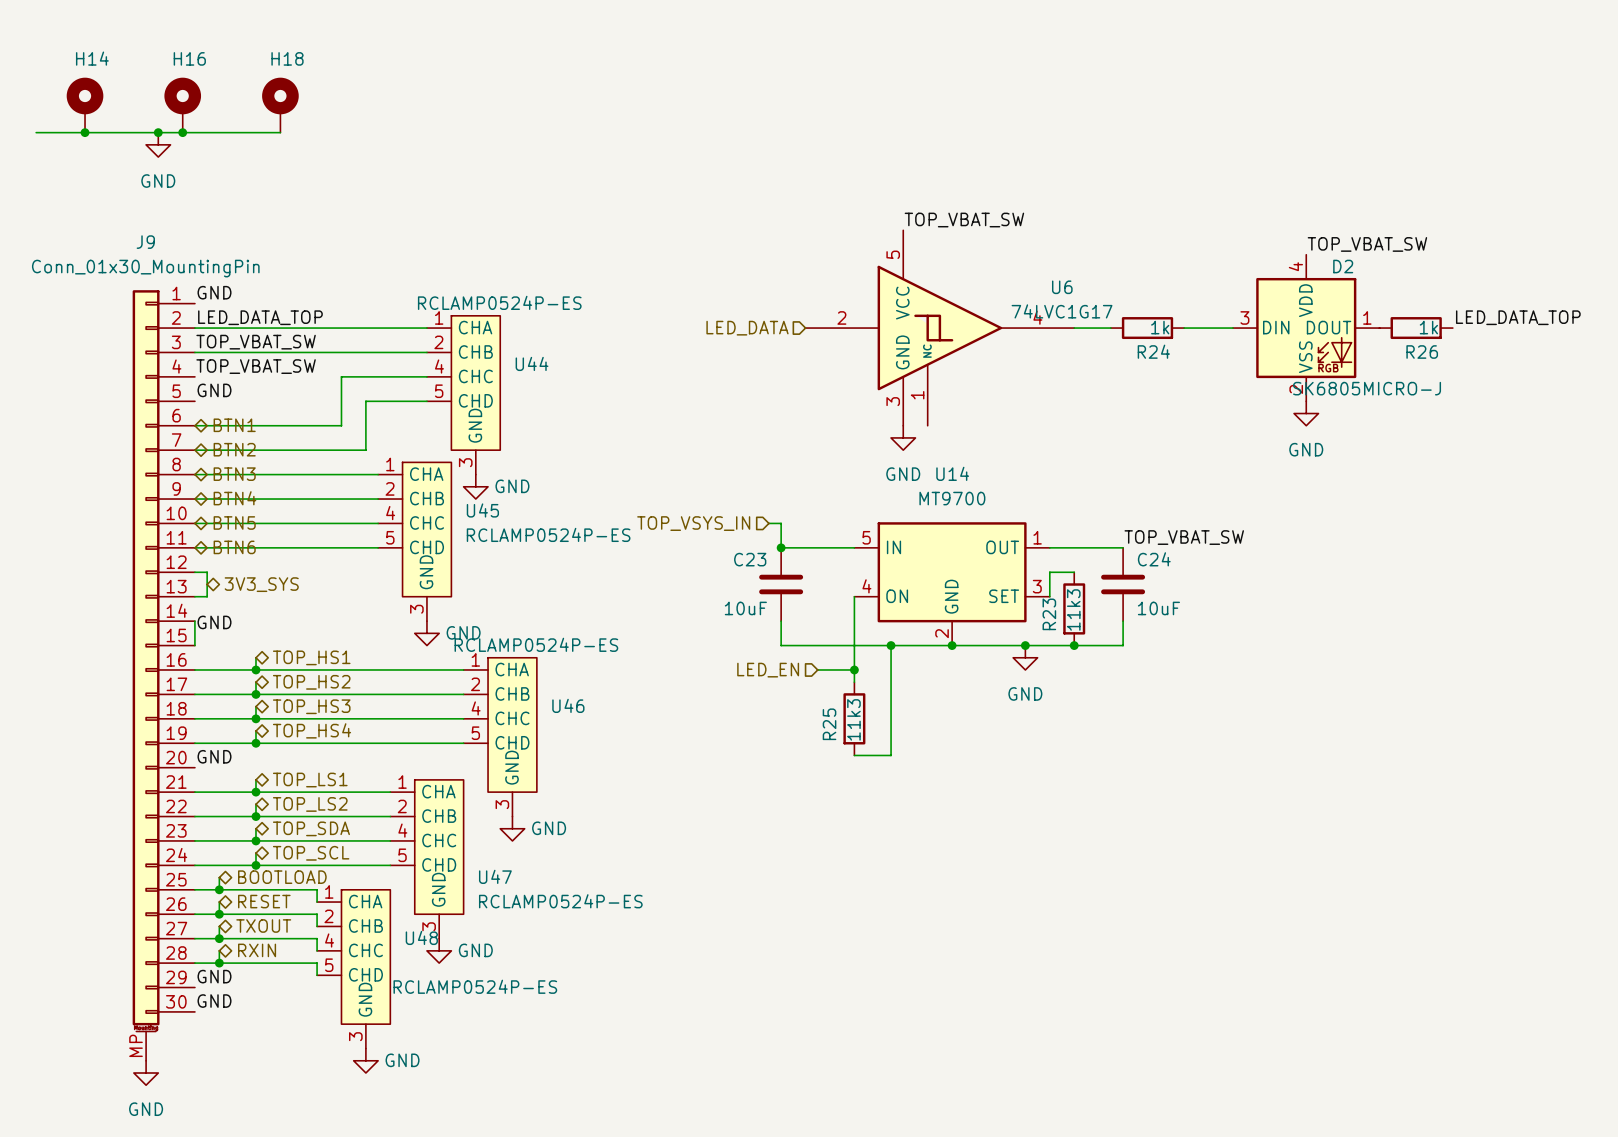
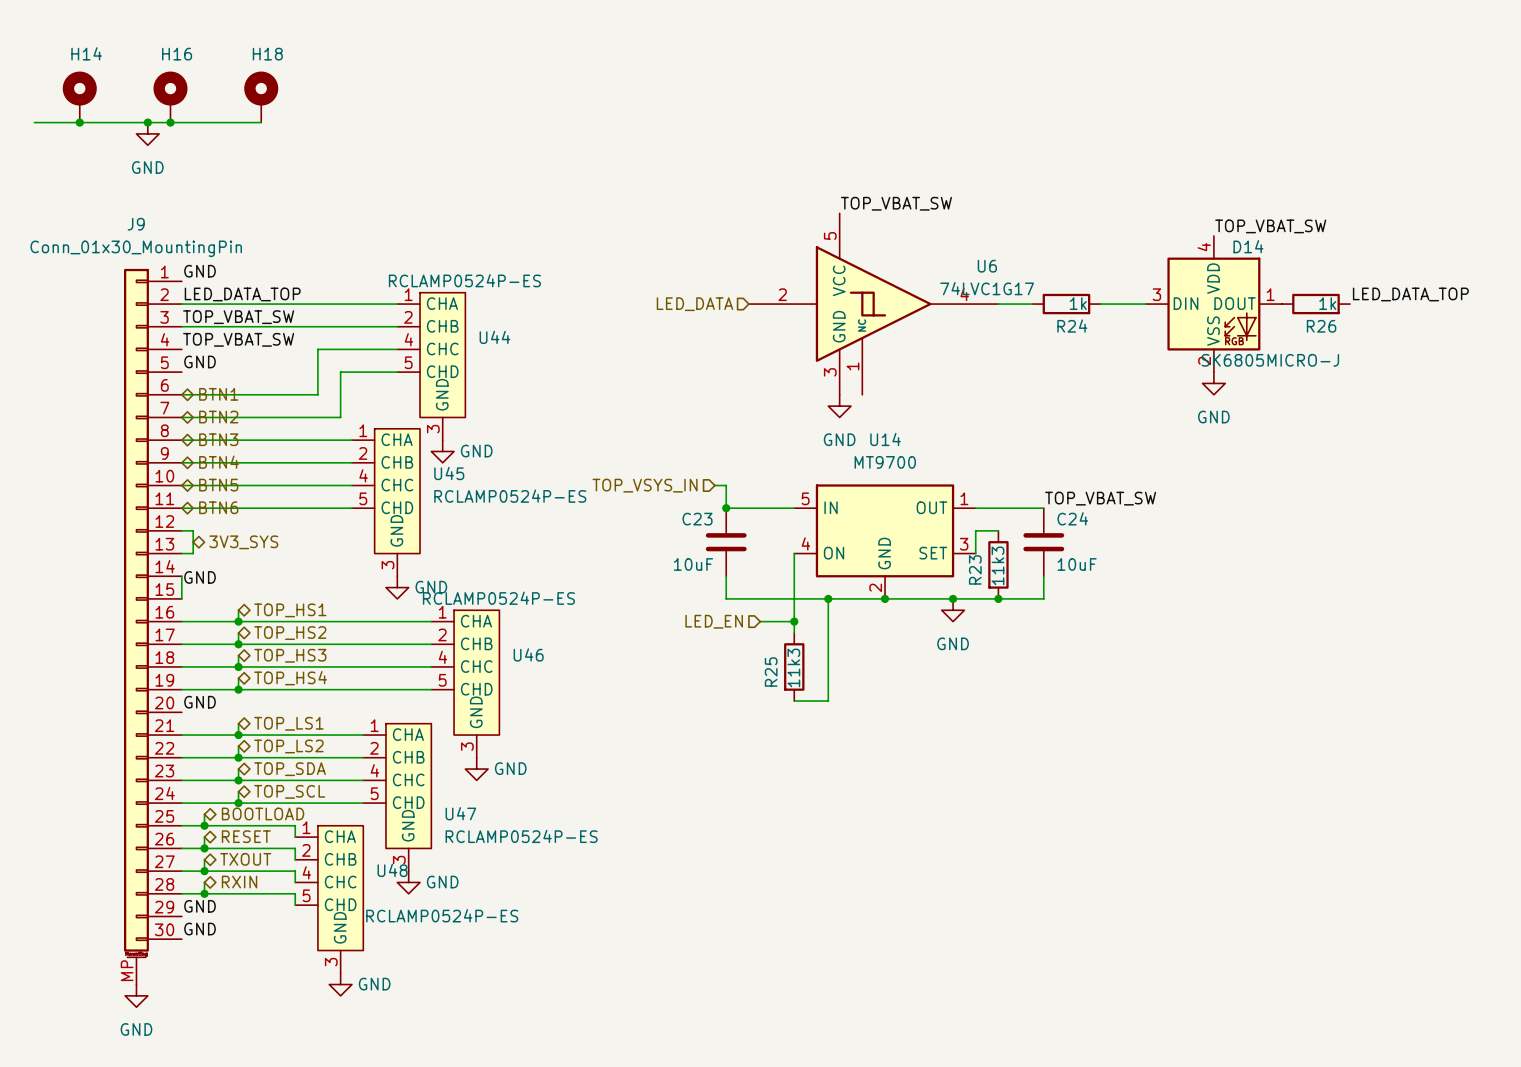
D2 name: D2 (1343, 266) -> D14 (1248, 246)

